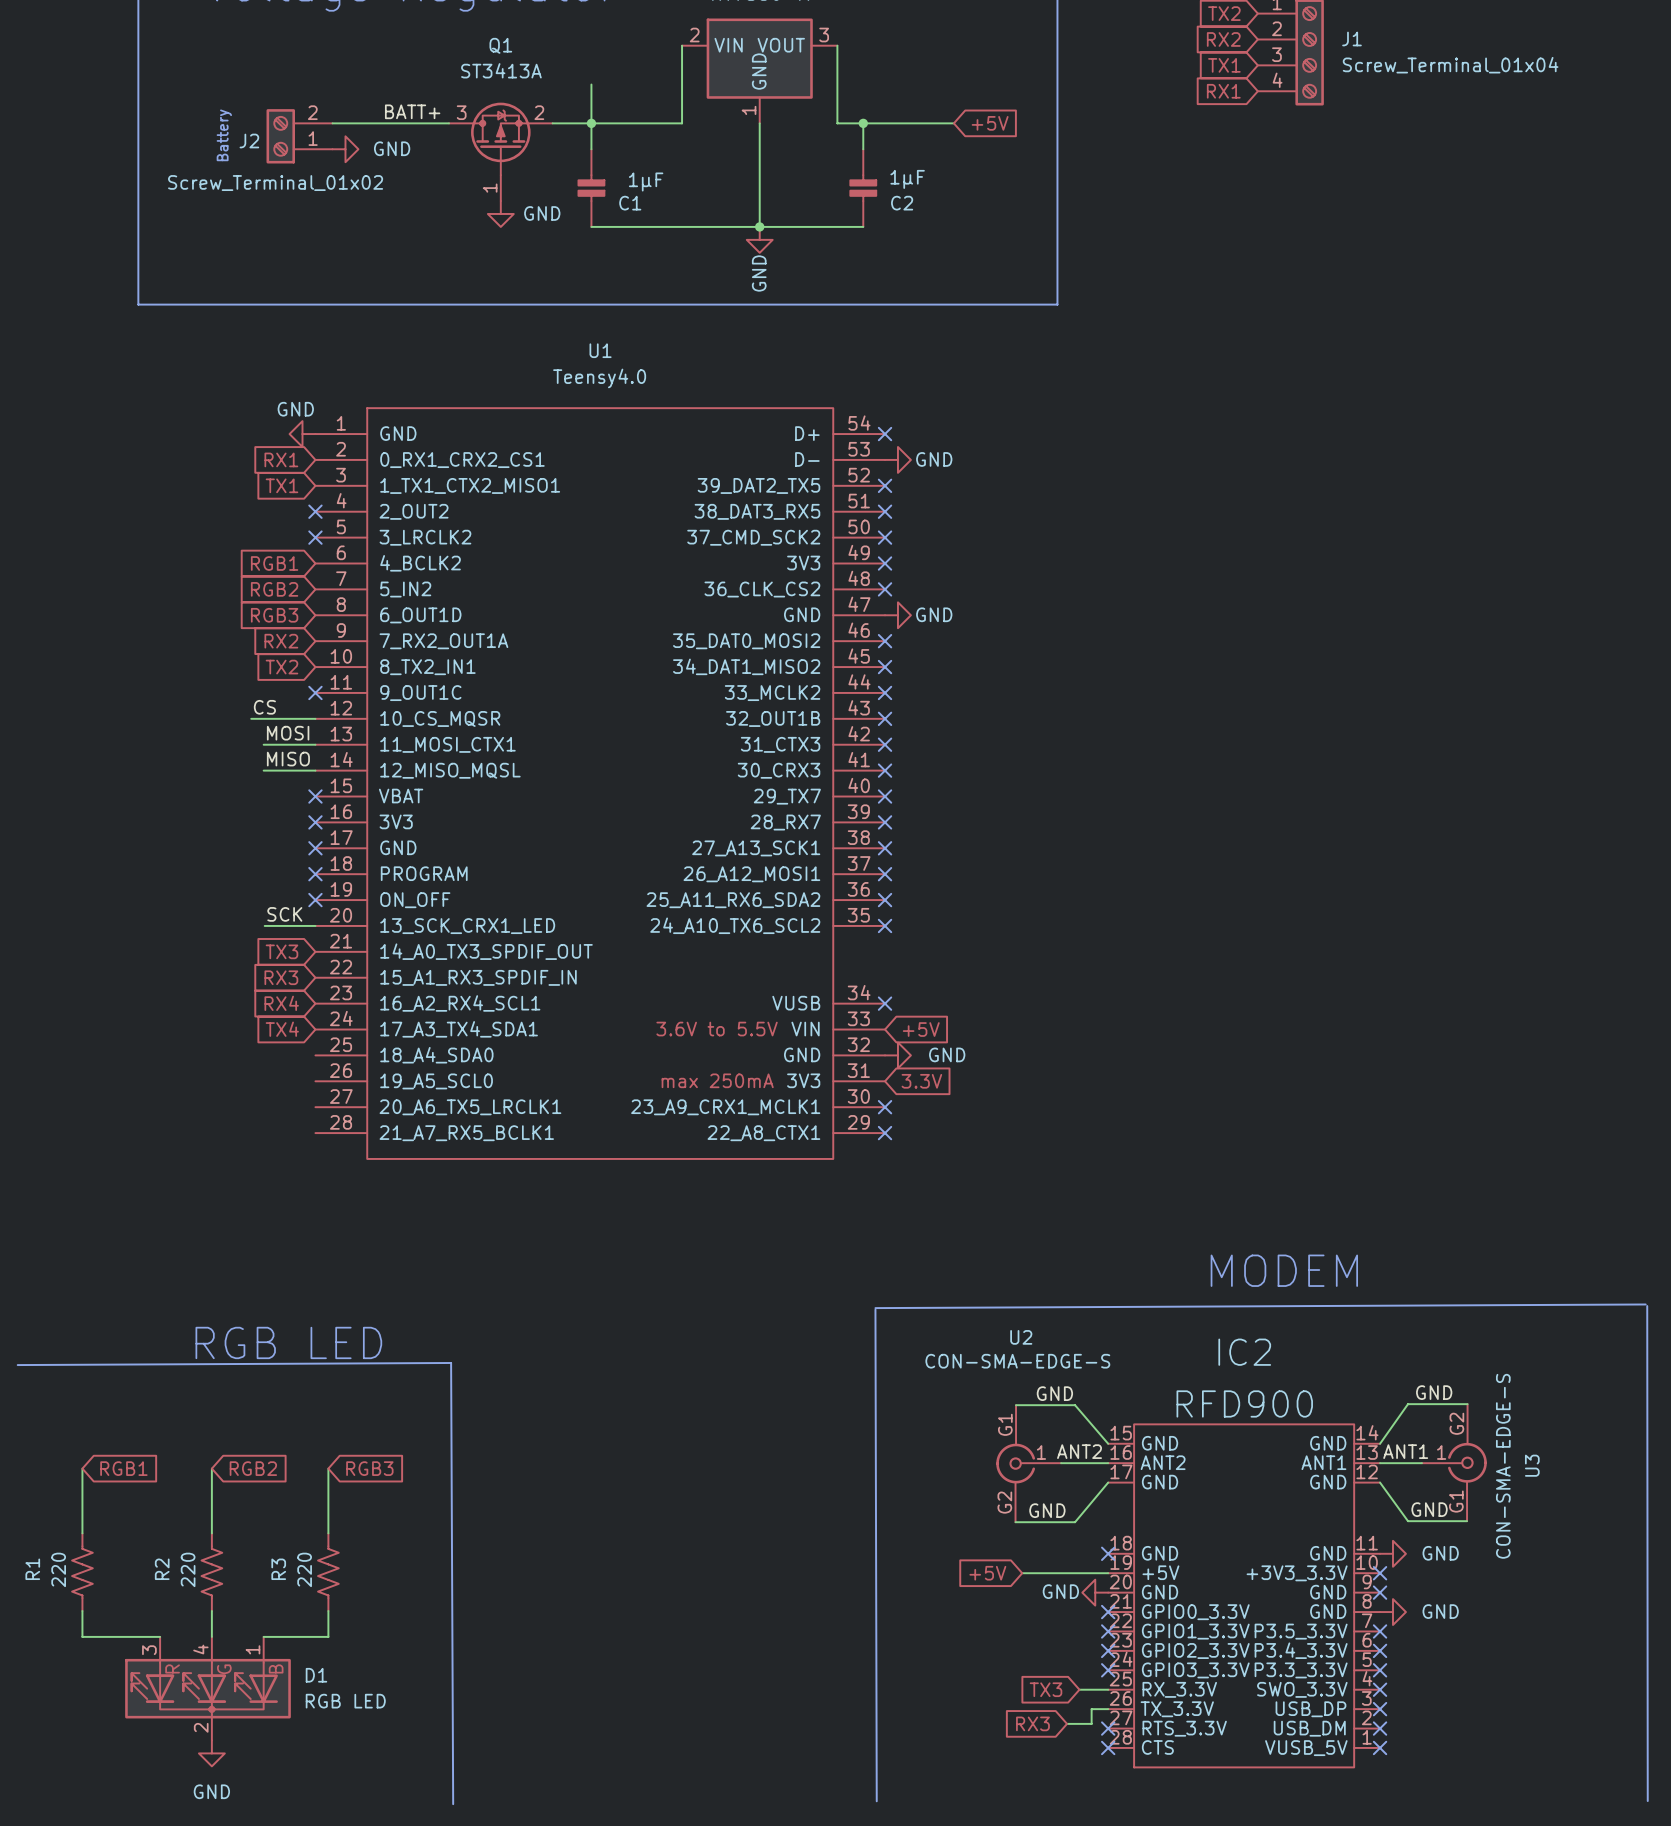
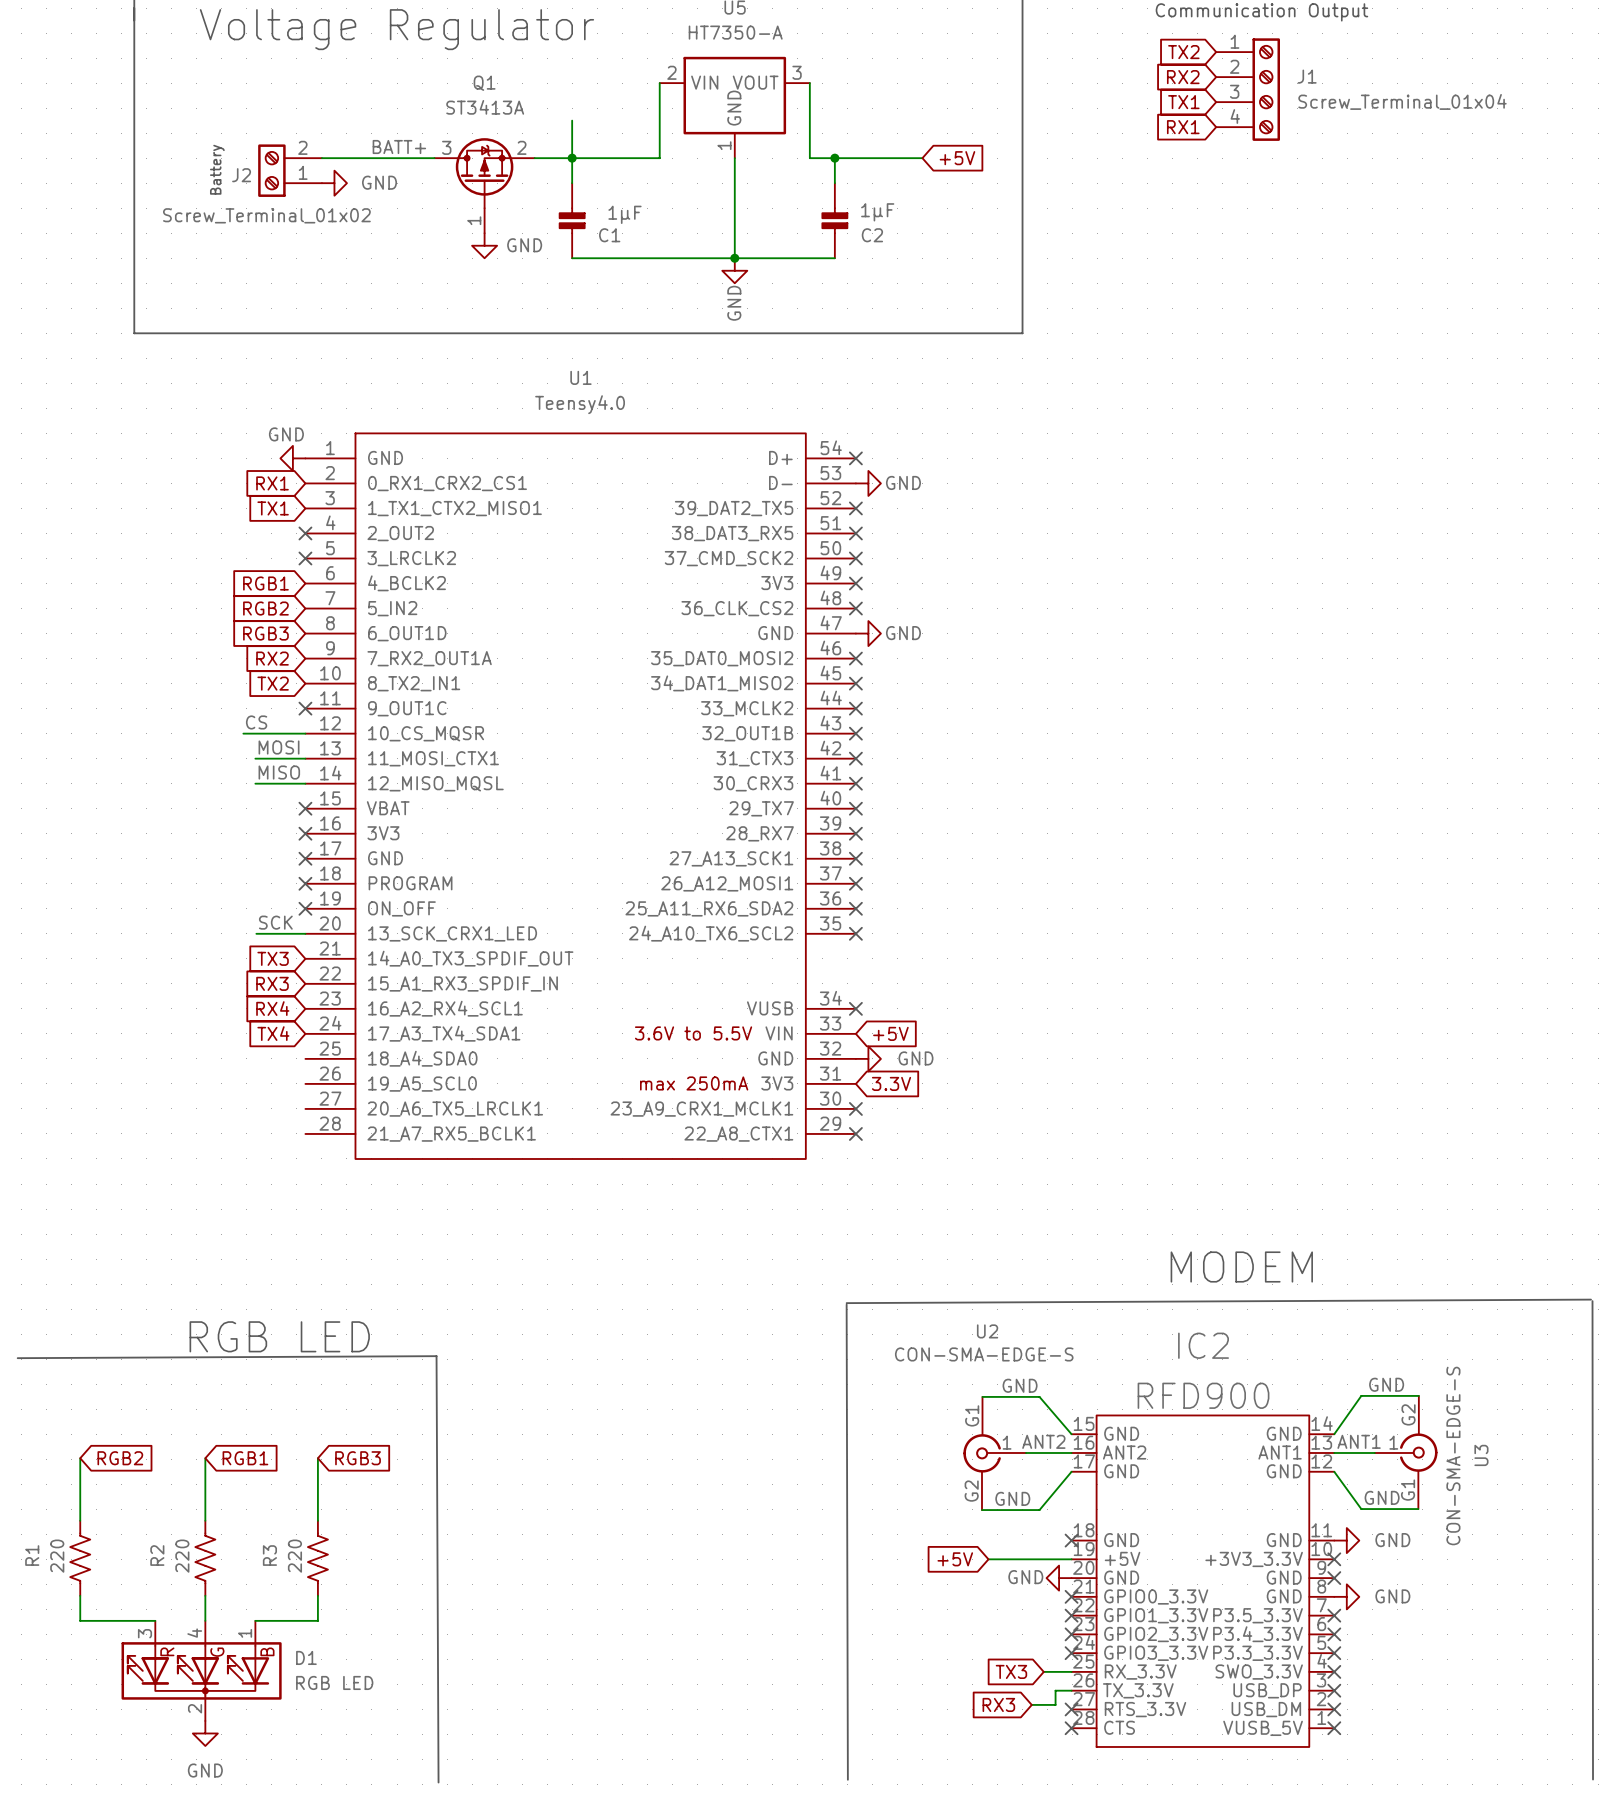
global label: RGB1 (123, 1468) -> RGB2 (120, 1458)
global label: RGB2 (253, 1468) -> RGB1 (245, 1458)

